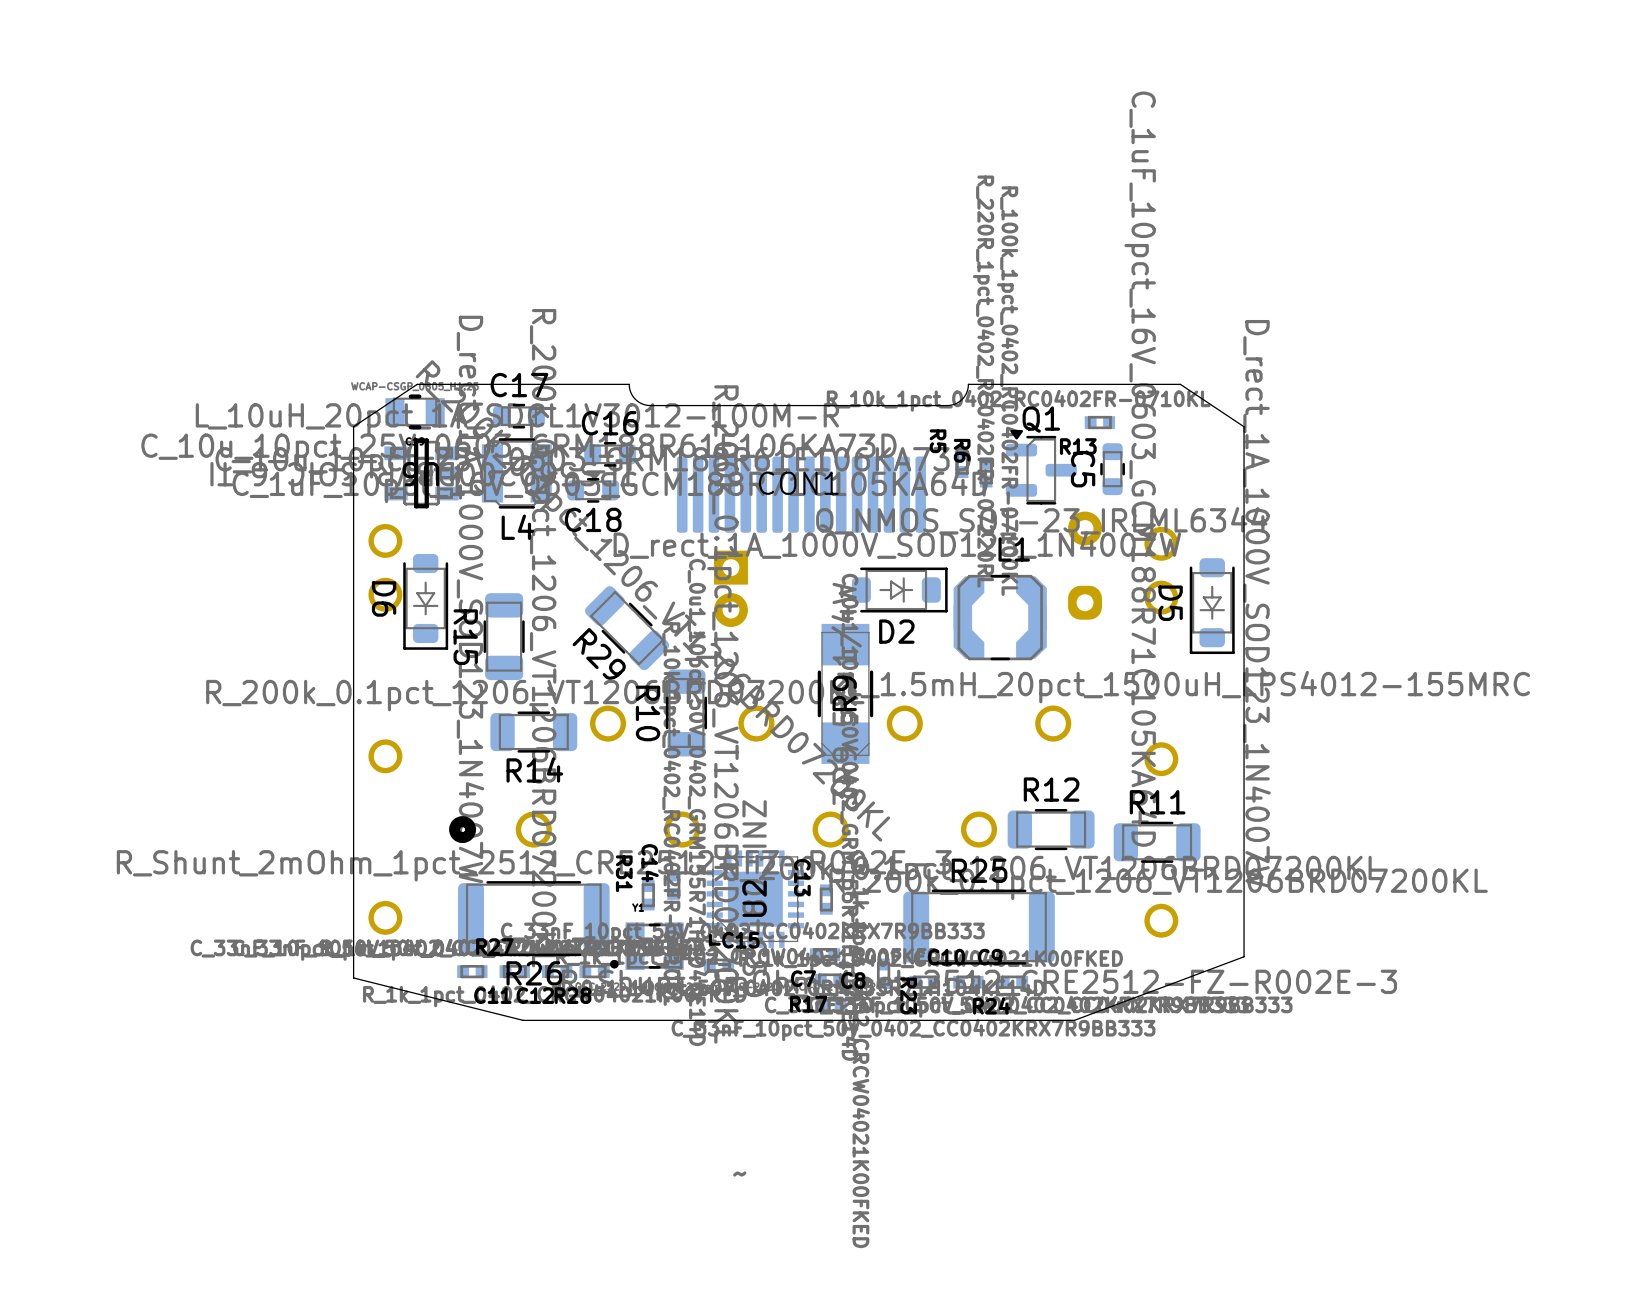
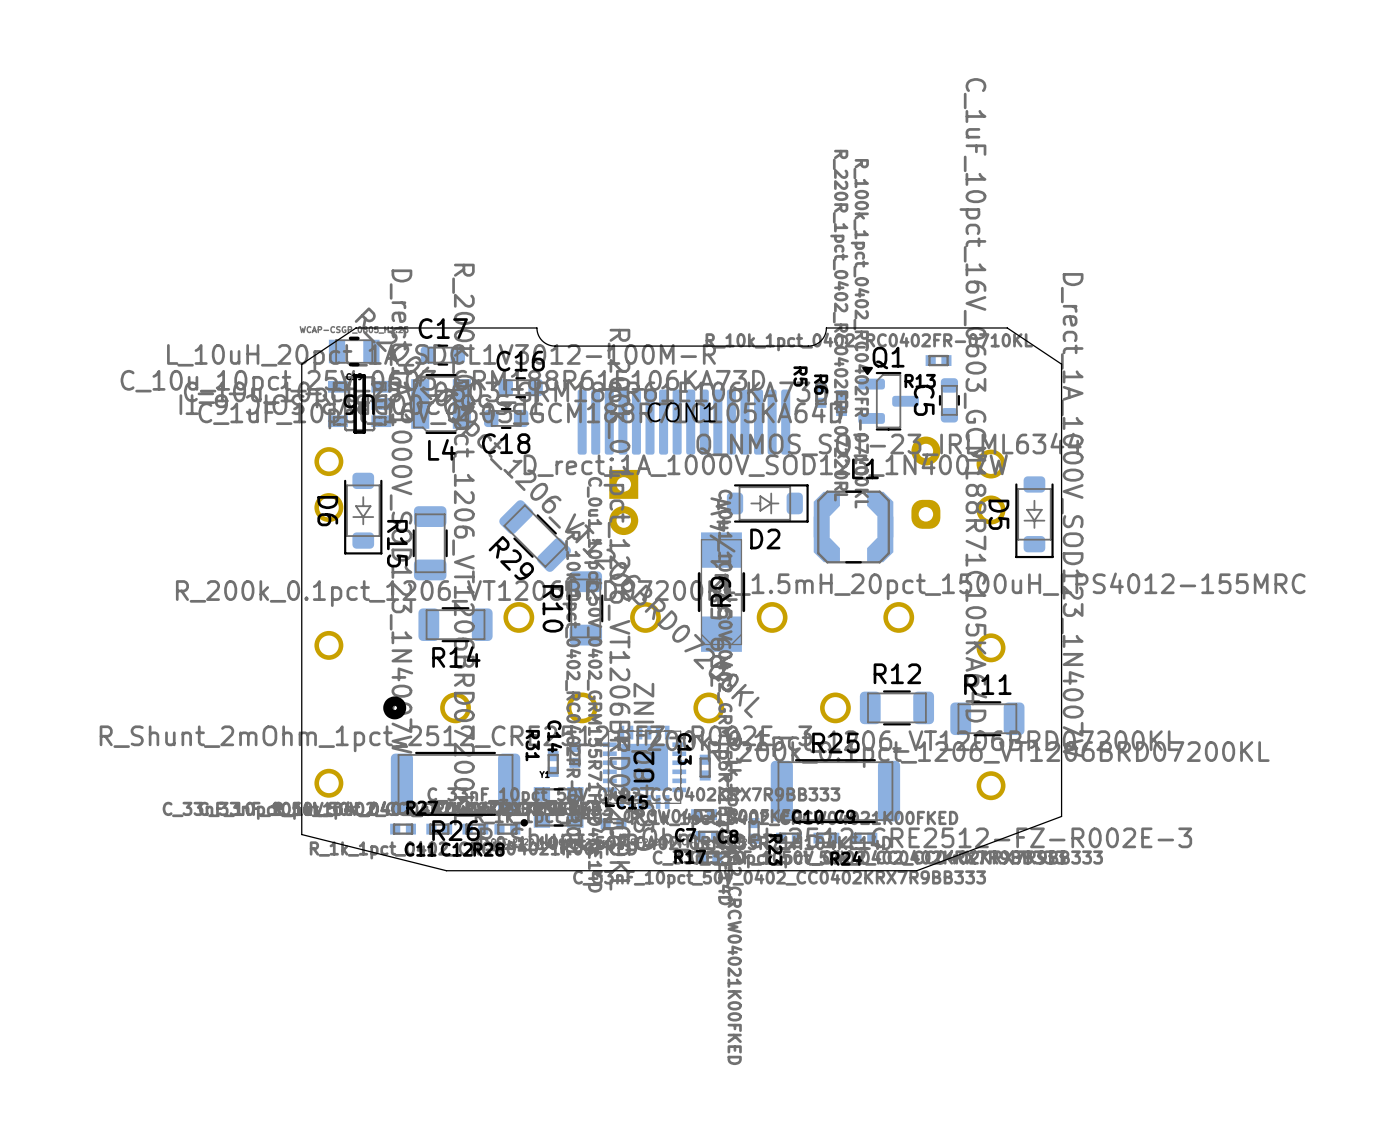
text: ~ (739, 1174) -> none

